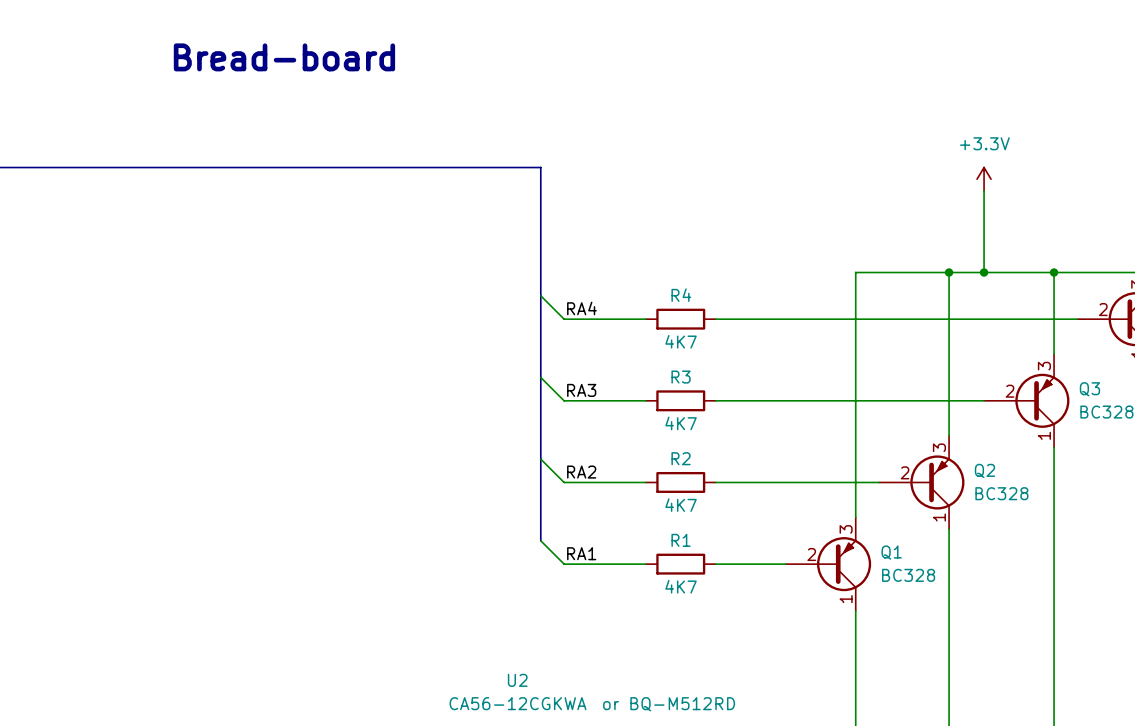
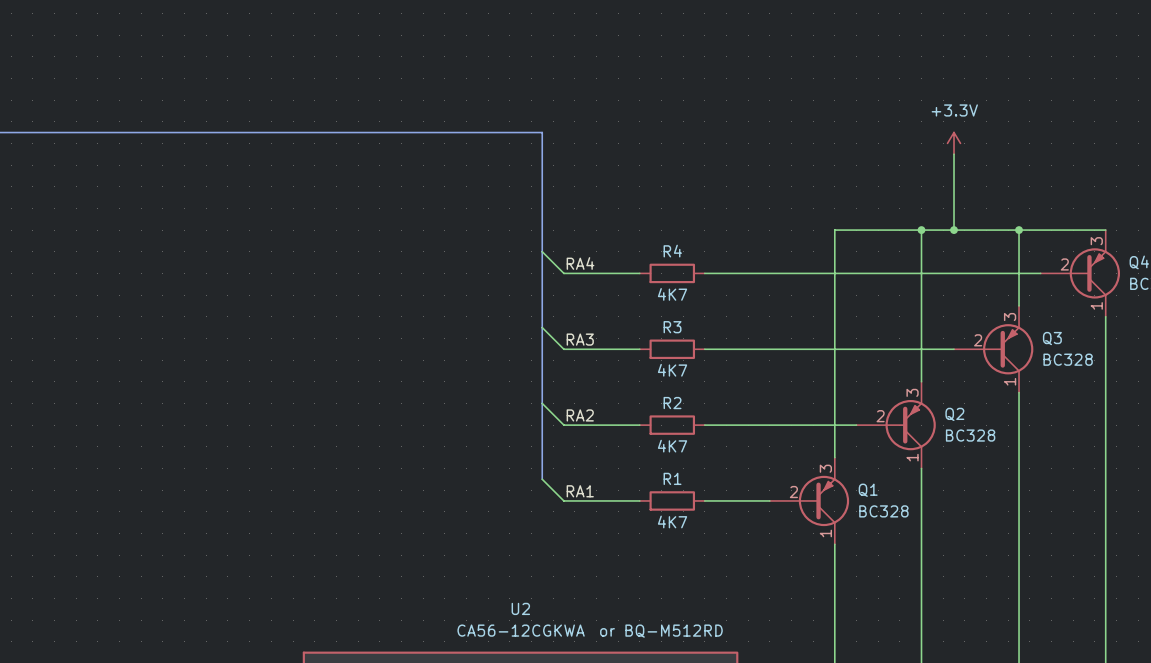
text: Bread-board (284, 57) -> none

